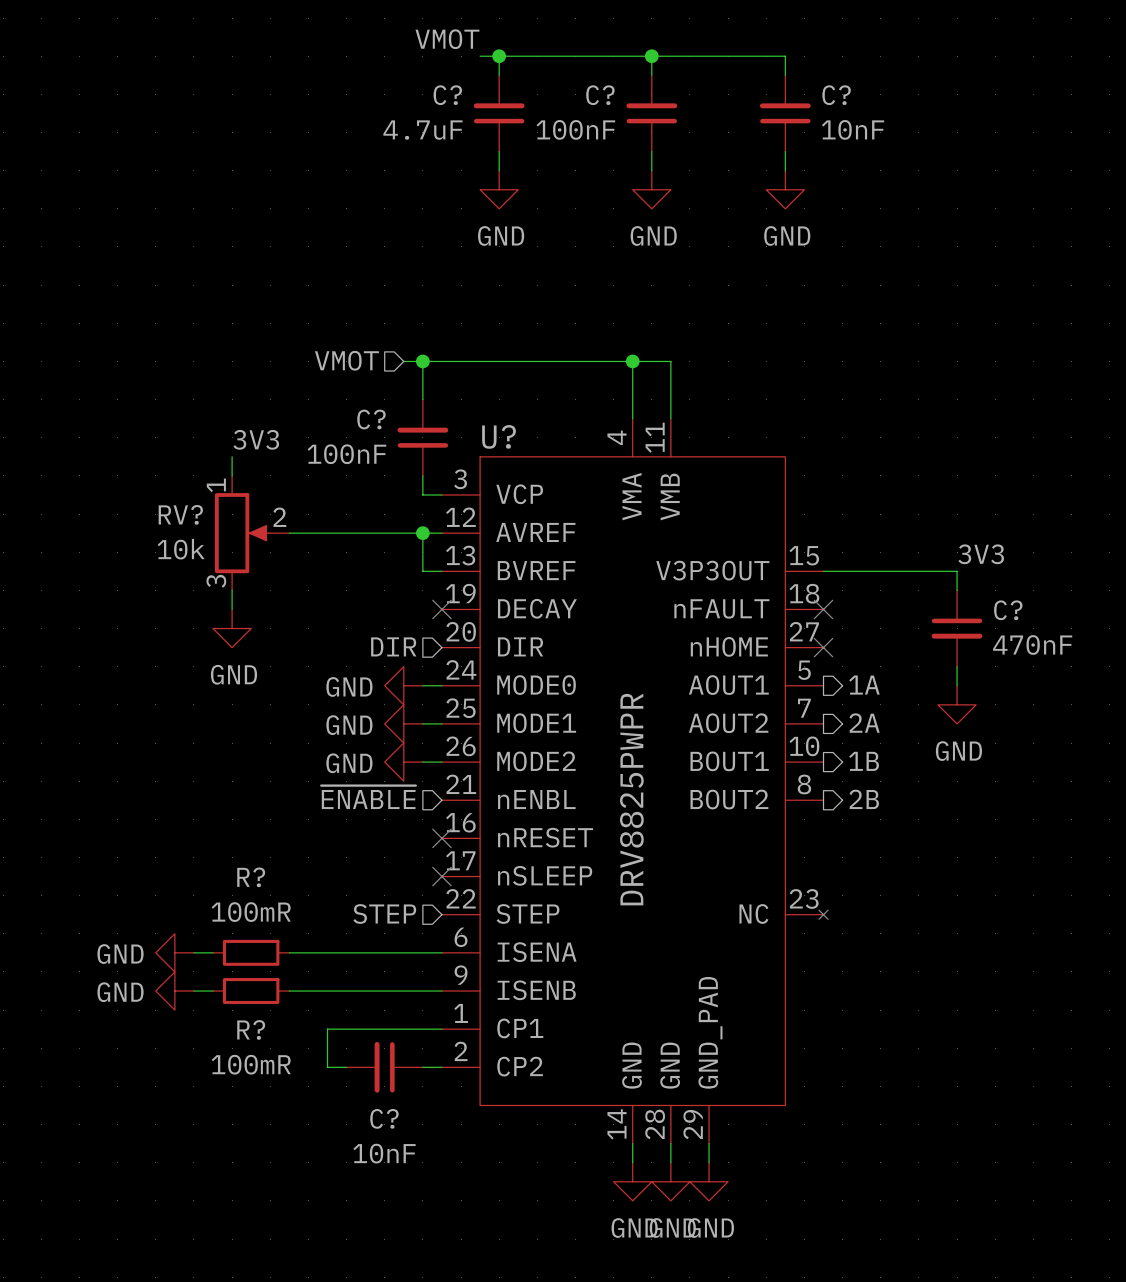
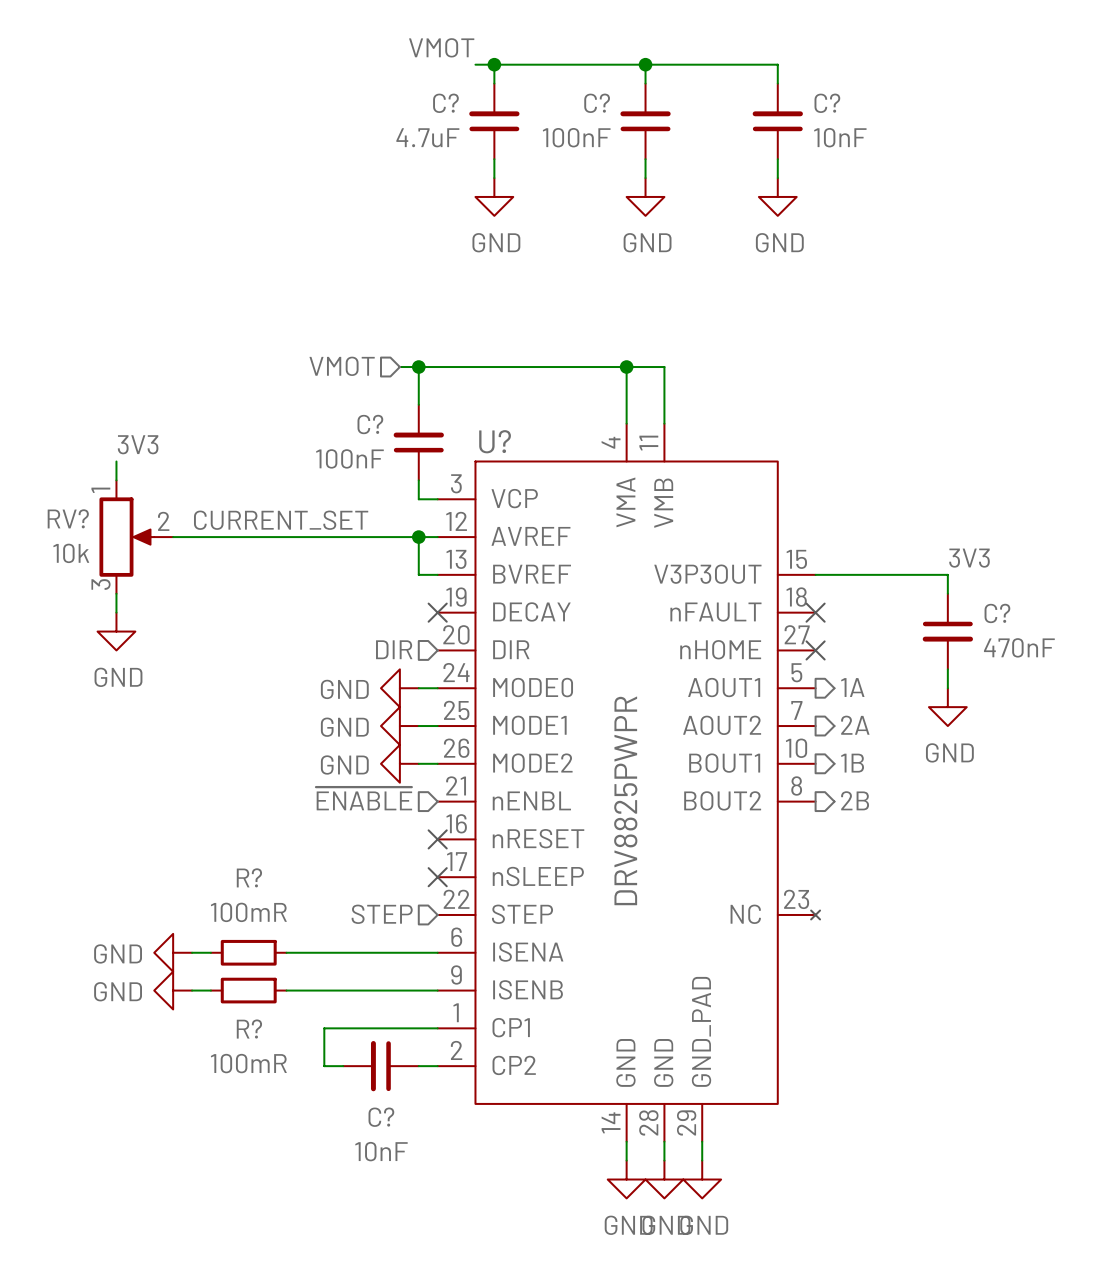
label position: 3V3 (256, 439) -> 3V3 (138, 444)
wire: (232, 456) (232, 475) -> (116, 461) (116, 480)
label: none -> CURRENT_SET (281, 520)
wire: none -> (173, 537) (286, 537)
RV? position: (252, 533) -> (136, 537)
wire: (232, 590) (232, 609) -> (116, 593) (116, 612)
power symbol position: GND (232, 628) -> GND (116, 631)

